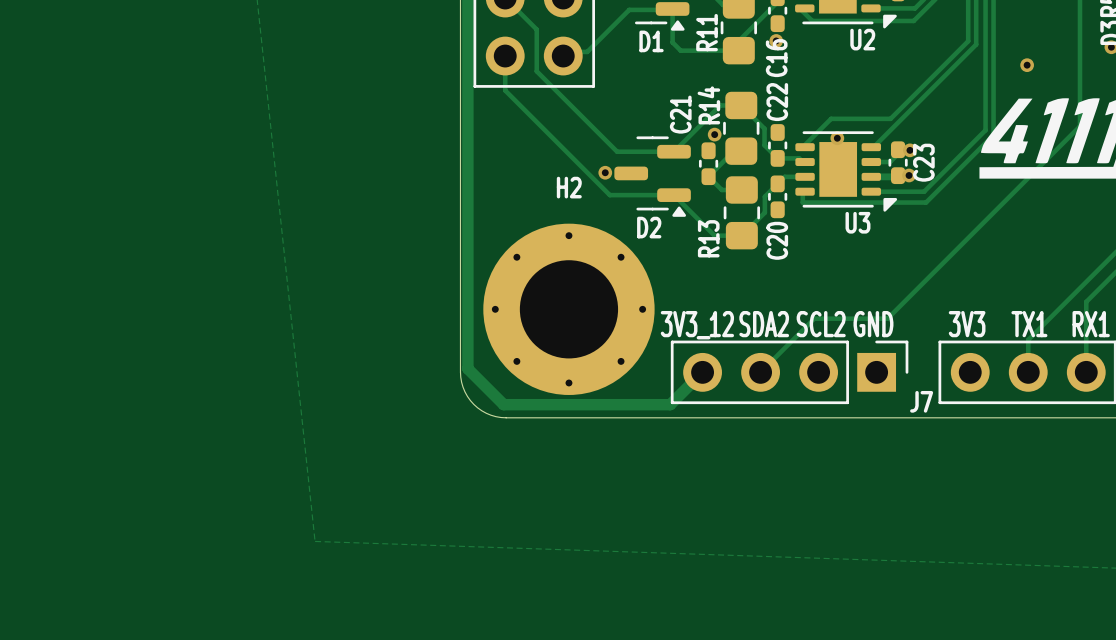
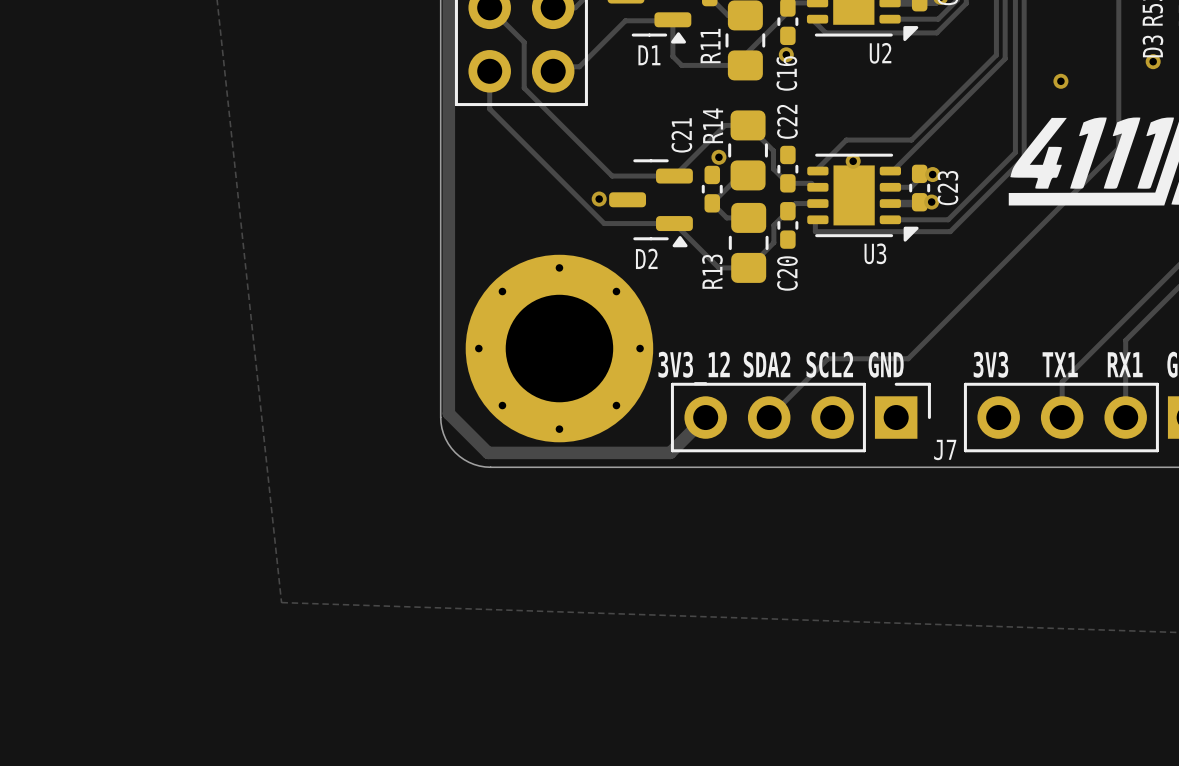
H2 name: H2 (569, 187) -> none

